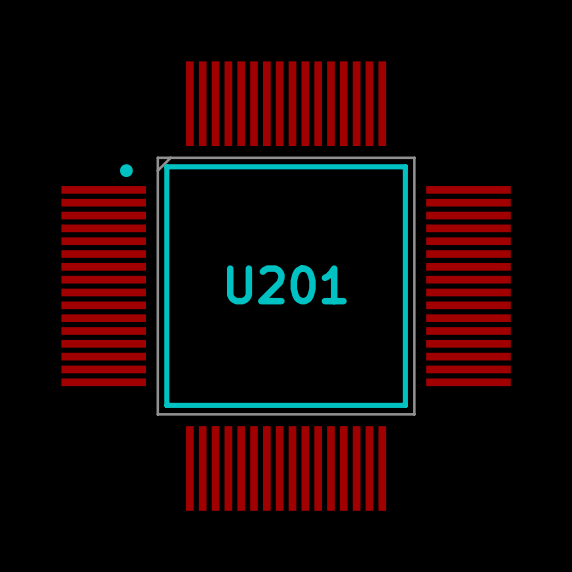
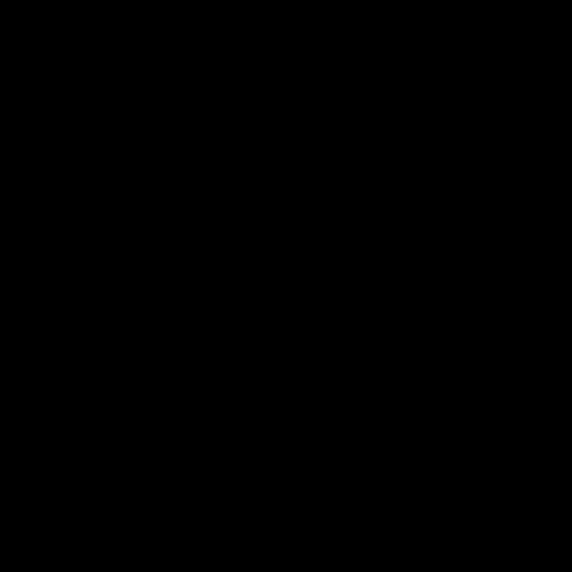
U201: (286, 286) -> none

